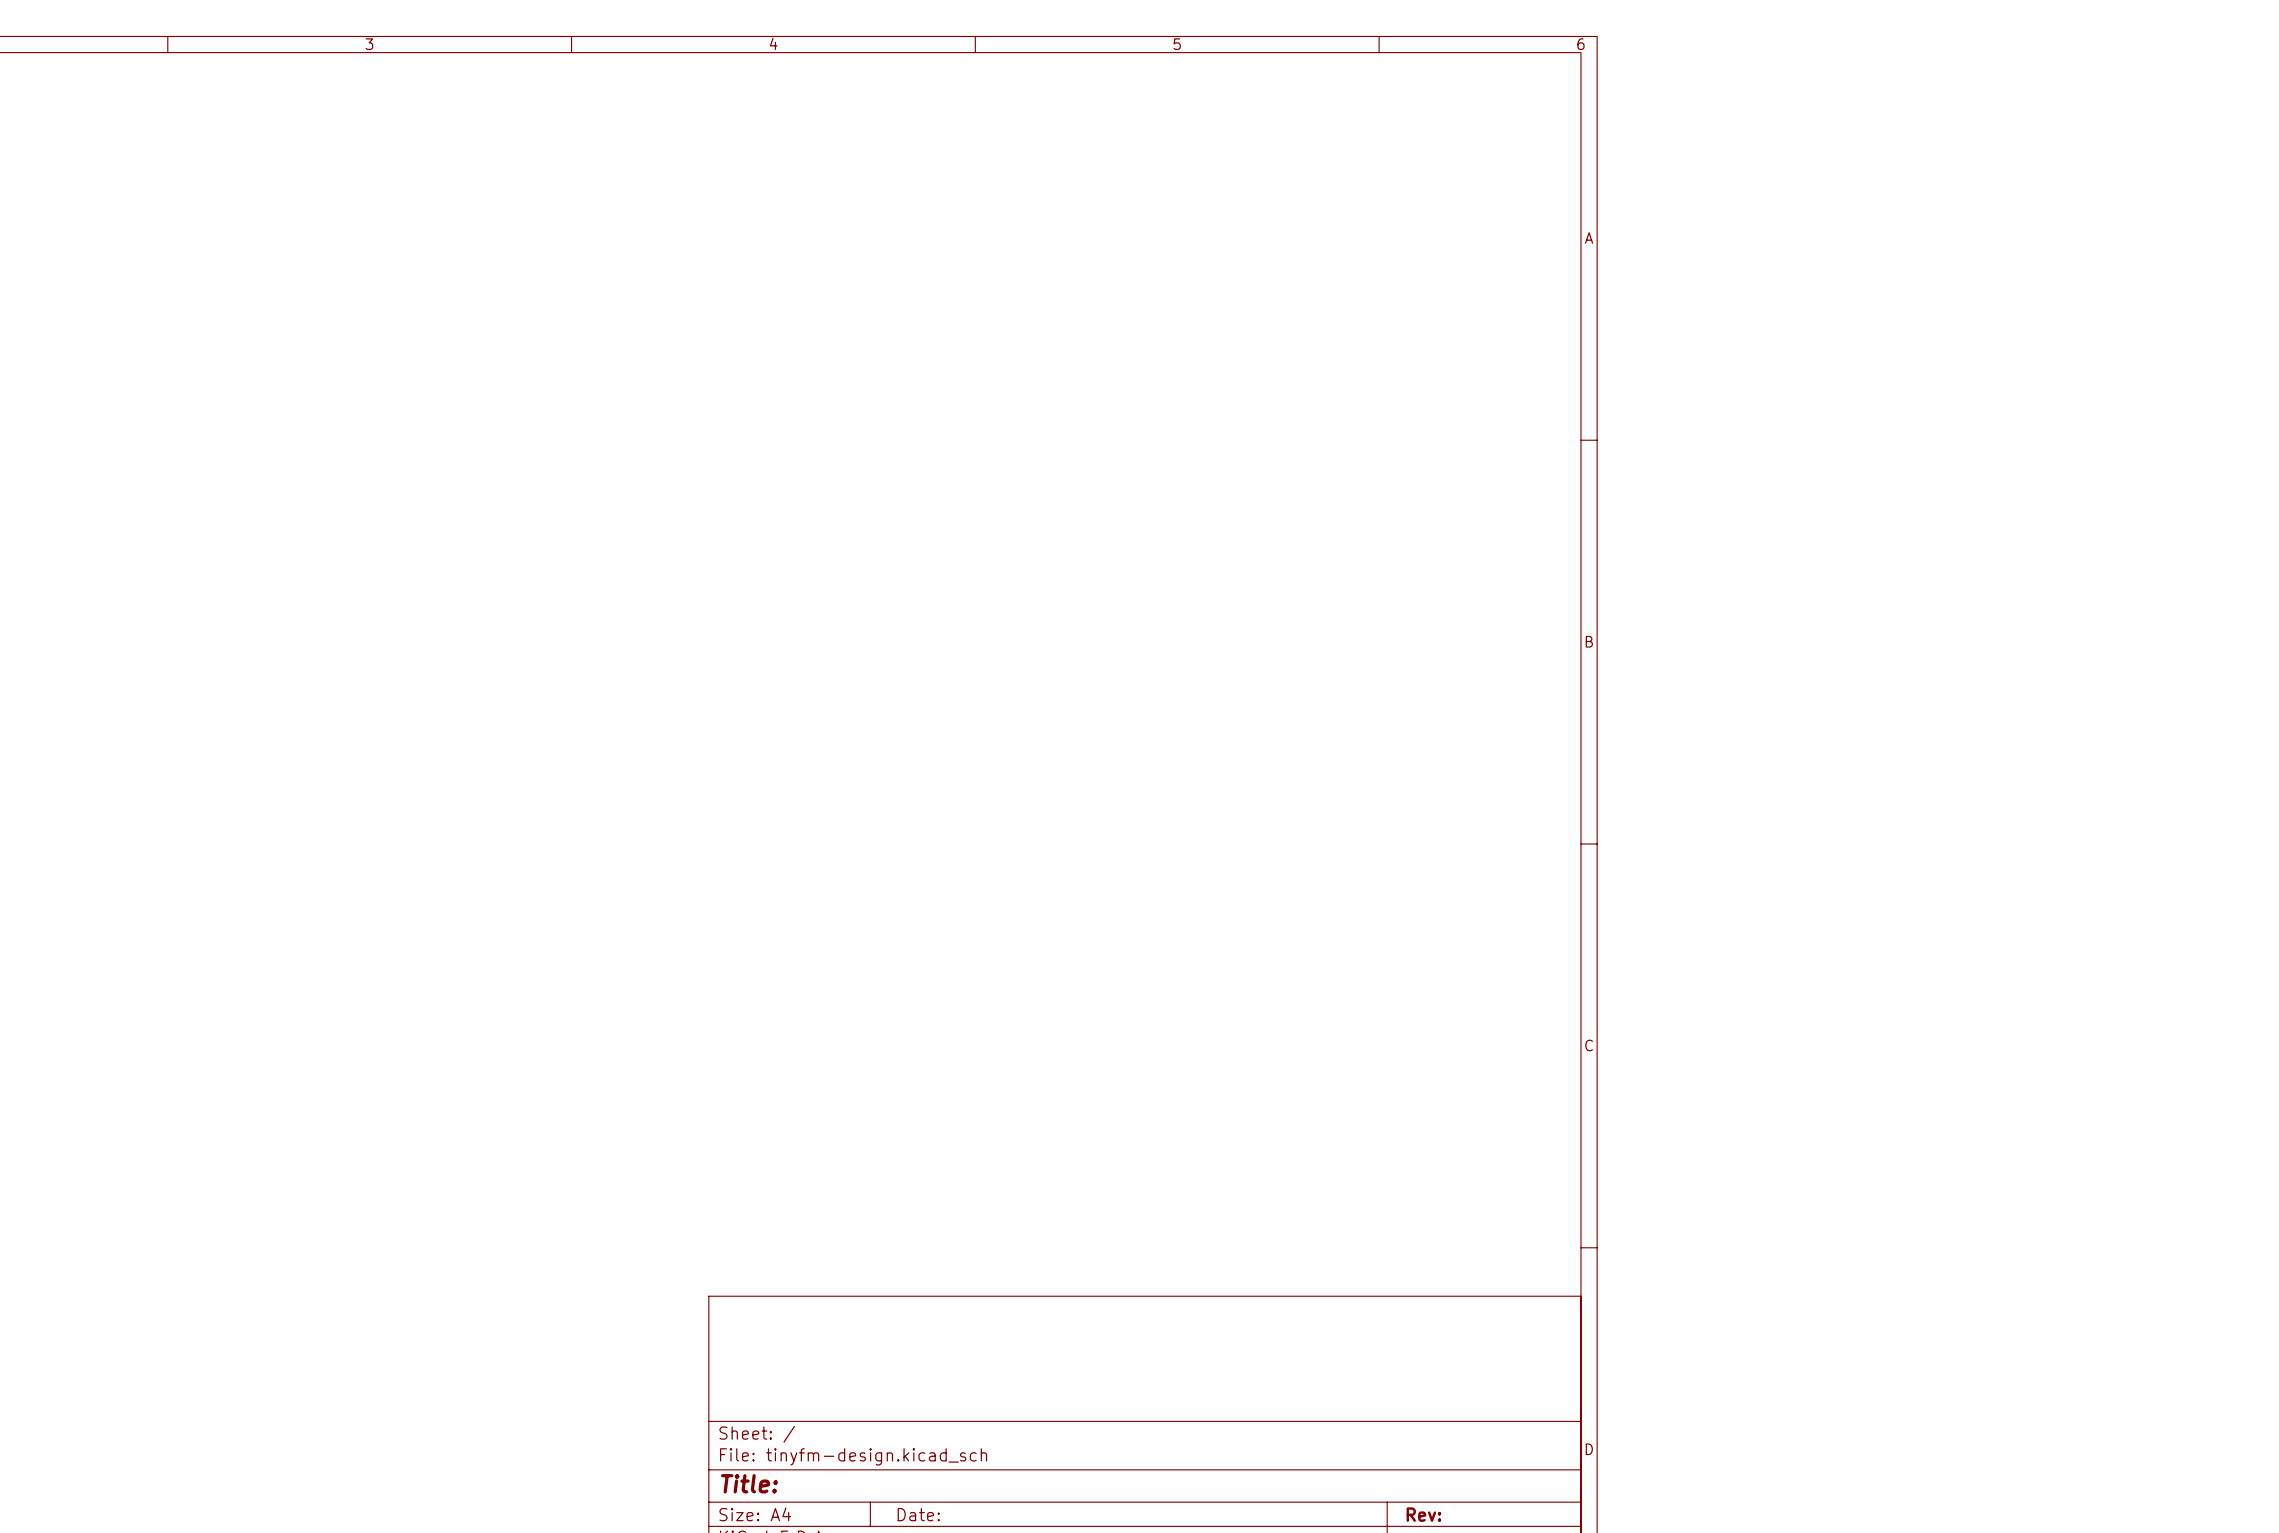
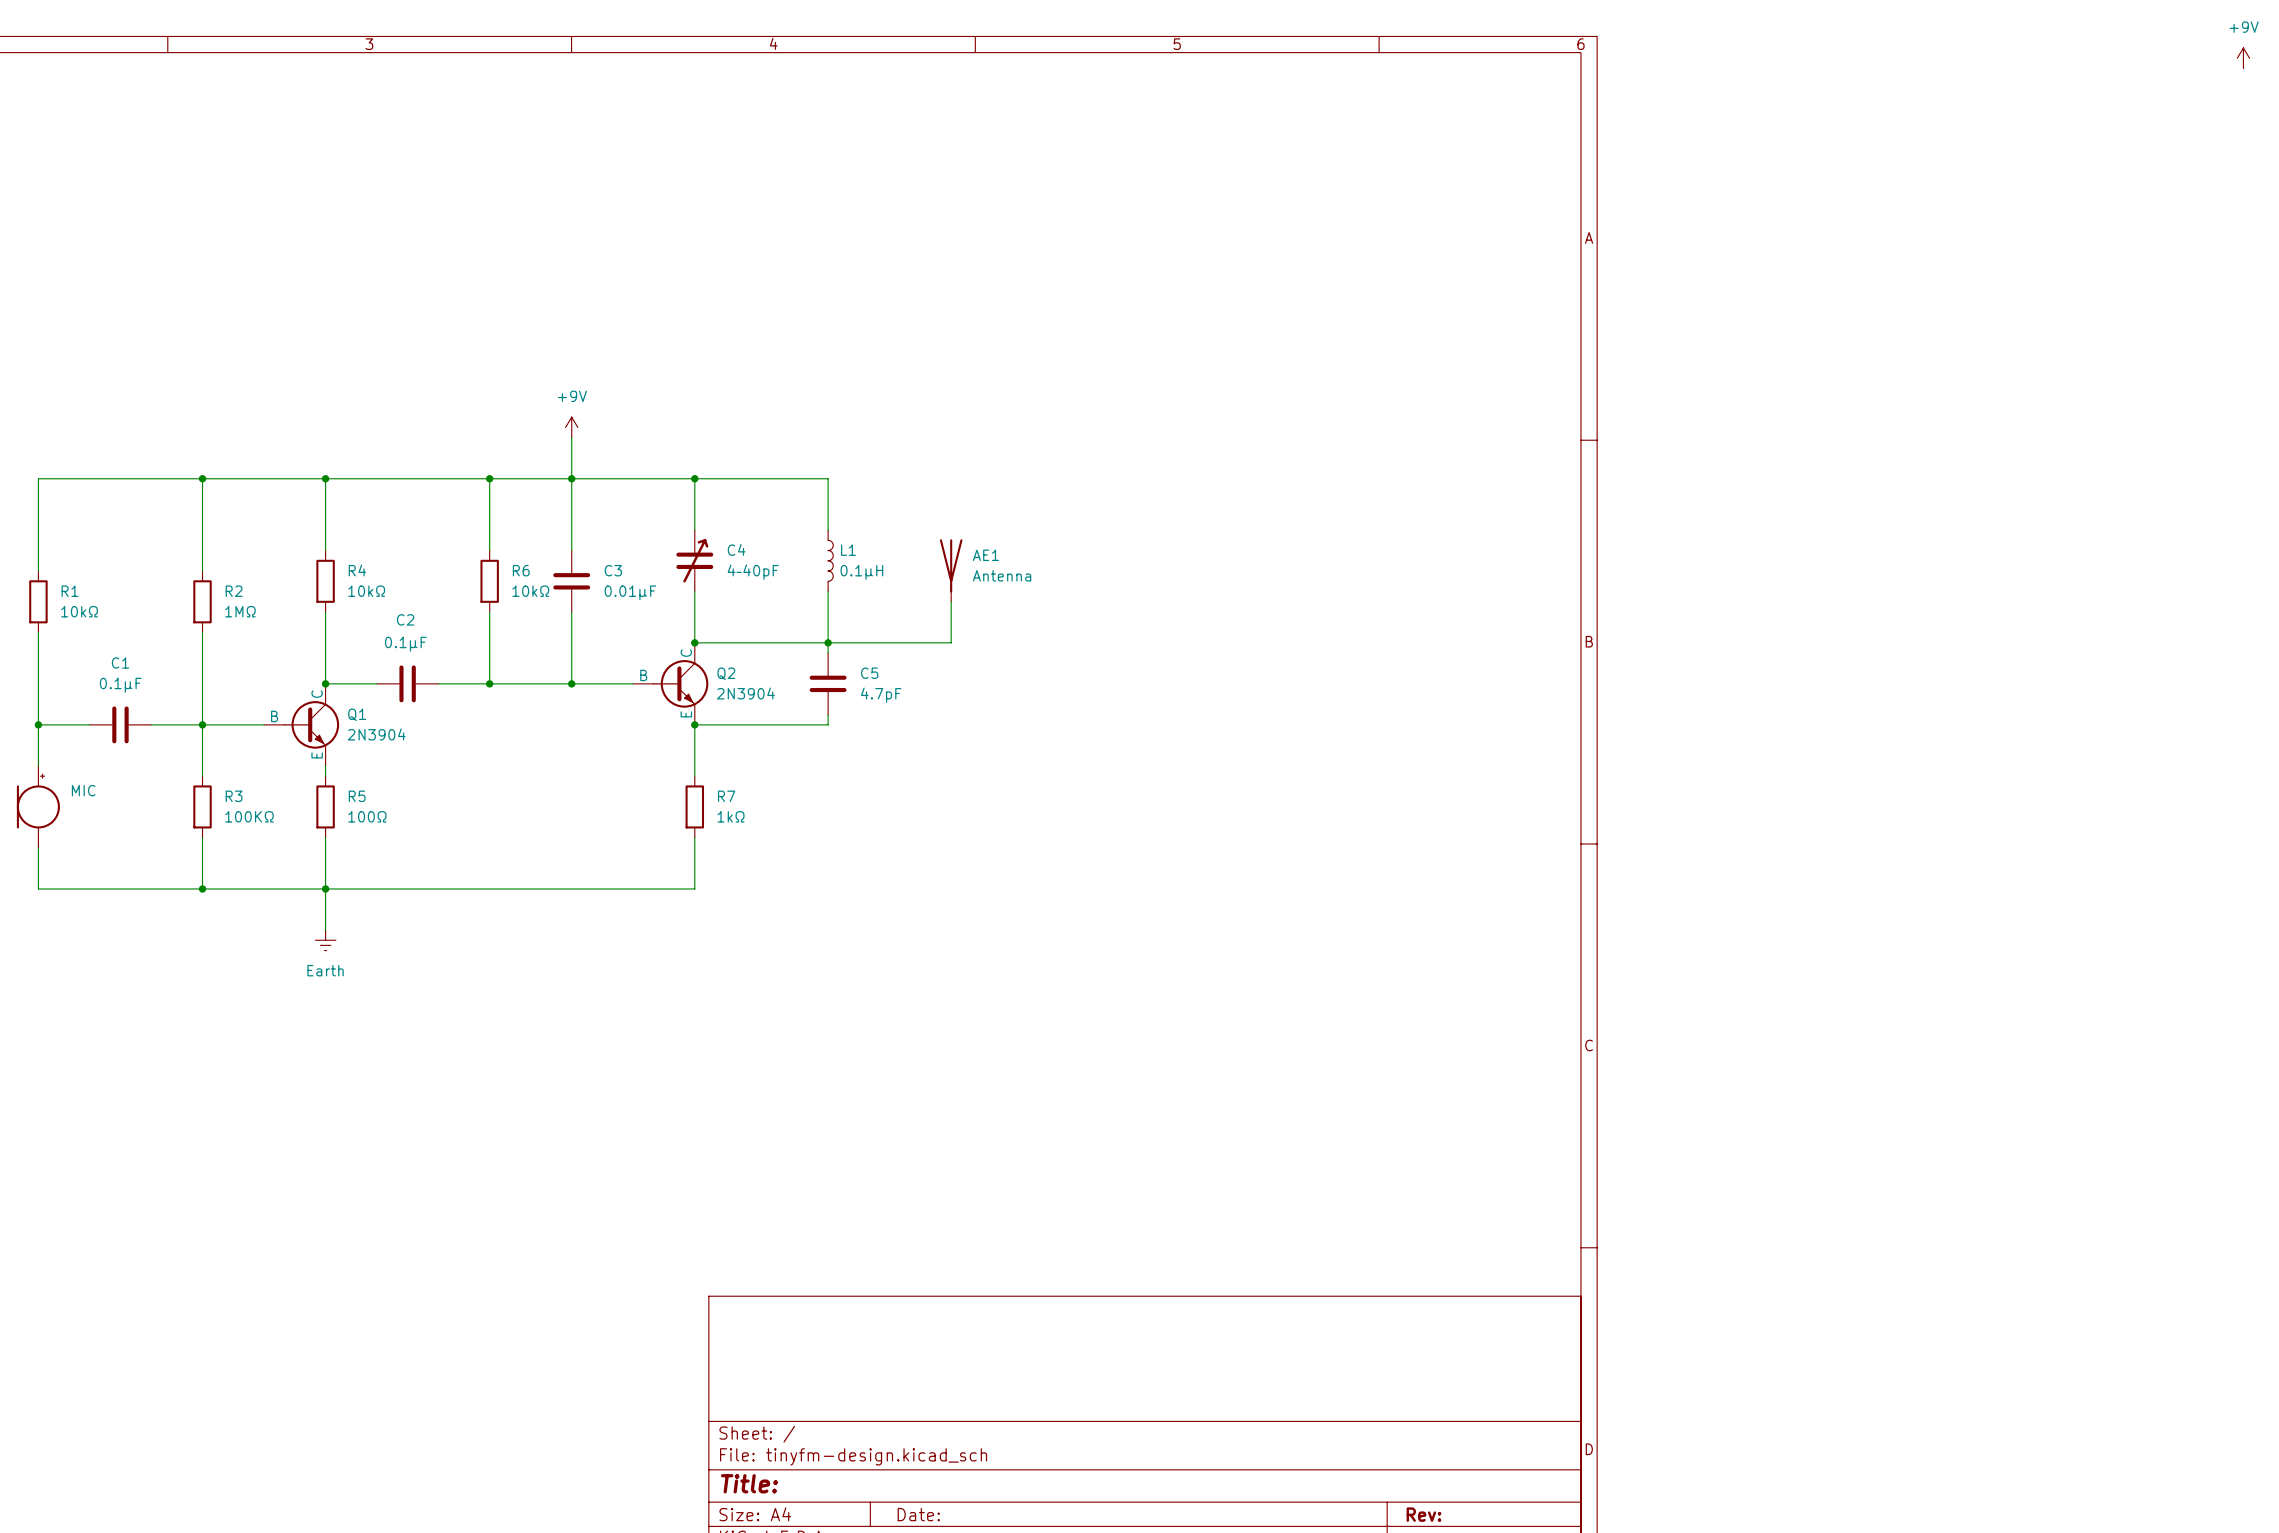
power symbol: none -> +9V (2243, 58)
power symbol: none -> +9V (571, 427)
wire: none -> (571, 437) (571, 550)
wire: none -> (202, 478) (202, 571)
junction: none -> (202, 478)
wire: none -> (325, 478) (325, 550)
junction: none -> (325, 478)
wire: none -> (489, 478) (489, 550)
junction: none -> (489, 478)
junction: none -> (571, 478)
wire: none -> (694, 478) (694, 530)
junction: none -> (694, 478)
wire: none -> (828, 530) (828, 478) (38, 478) (38, 571)
C4: none -> 4–40pF (694, 560)
L1: none -> 0.1μH (830, 560)
AE1: none -> Antenna (951, 570)
R4: none -> 10kΩ (325, 581)
R6: none -> 10kΩ (489, 581)
C3: none -> 0.01μF (571, 581)
wire: none -> (694, 591) (694, 642) (951, 642) (951, 601)
wire: none -> (828, 591) (828, 653)
R1: none -> 10kΩ (38, 601)
R2: none -> 1MΩ (202, 601)
wire: none -> (325, 612) (325, 683) (376, 683)
wire: none -> (489, 612) (489, 683)
wire: none -> (571, 612) (571, 683)
wire: none -> (38, 632) (38, 765)
wire: none -> (202, 632) (202, 776)
junction: none -> (694, 642)
junction: none -> (828, 642)
junction: none -> (325, 683)
C2: none -> 0.1μF (407, 683)
wire: none -> (438, 683) (633, 683)
junction: none -> (489, 683)
junction: none -> (571, 683)
Q2: none -> 2N3904 (670, 683)
C5: none -> 4.7pF (828, 683)
wire: none -> (828, 714) (828, 724) (694, 724) (694, 776)
wire: none -> (38, 724) (89, 724)
junction: none -> (38, 724)
C1: none -> 0.1μF (120, 724)
wire: none -> (151, 724) (264, 724)
junction: none -> (202, 724)
Q1: none -> 2N3904 (301, 724)
junction: none -> (694, 724)
wire: none -> (325, 765) (325, 776)
MIC: none -> (38, 806)
R3: none -> 100KΩ (202, 806)
R5: none -> 100Ω (325, 806)
R7: none -> 1kΩ (694, 806)
wire: none -> (202, 837) (202, 888)
wire: none -> (325, 837) (325, 930)
wire: none -> (694, 837) (694, 888) (38, 888) (38, 847)
junction: none -> (202, 888)
junction: none -> (325, 888)
power symbol: none -> Earth (325, 940)

